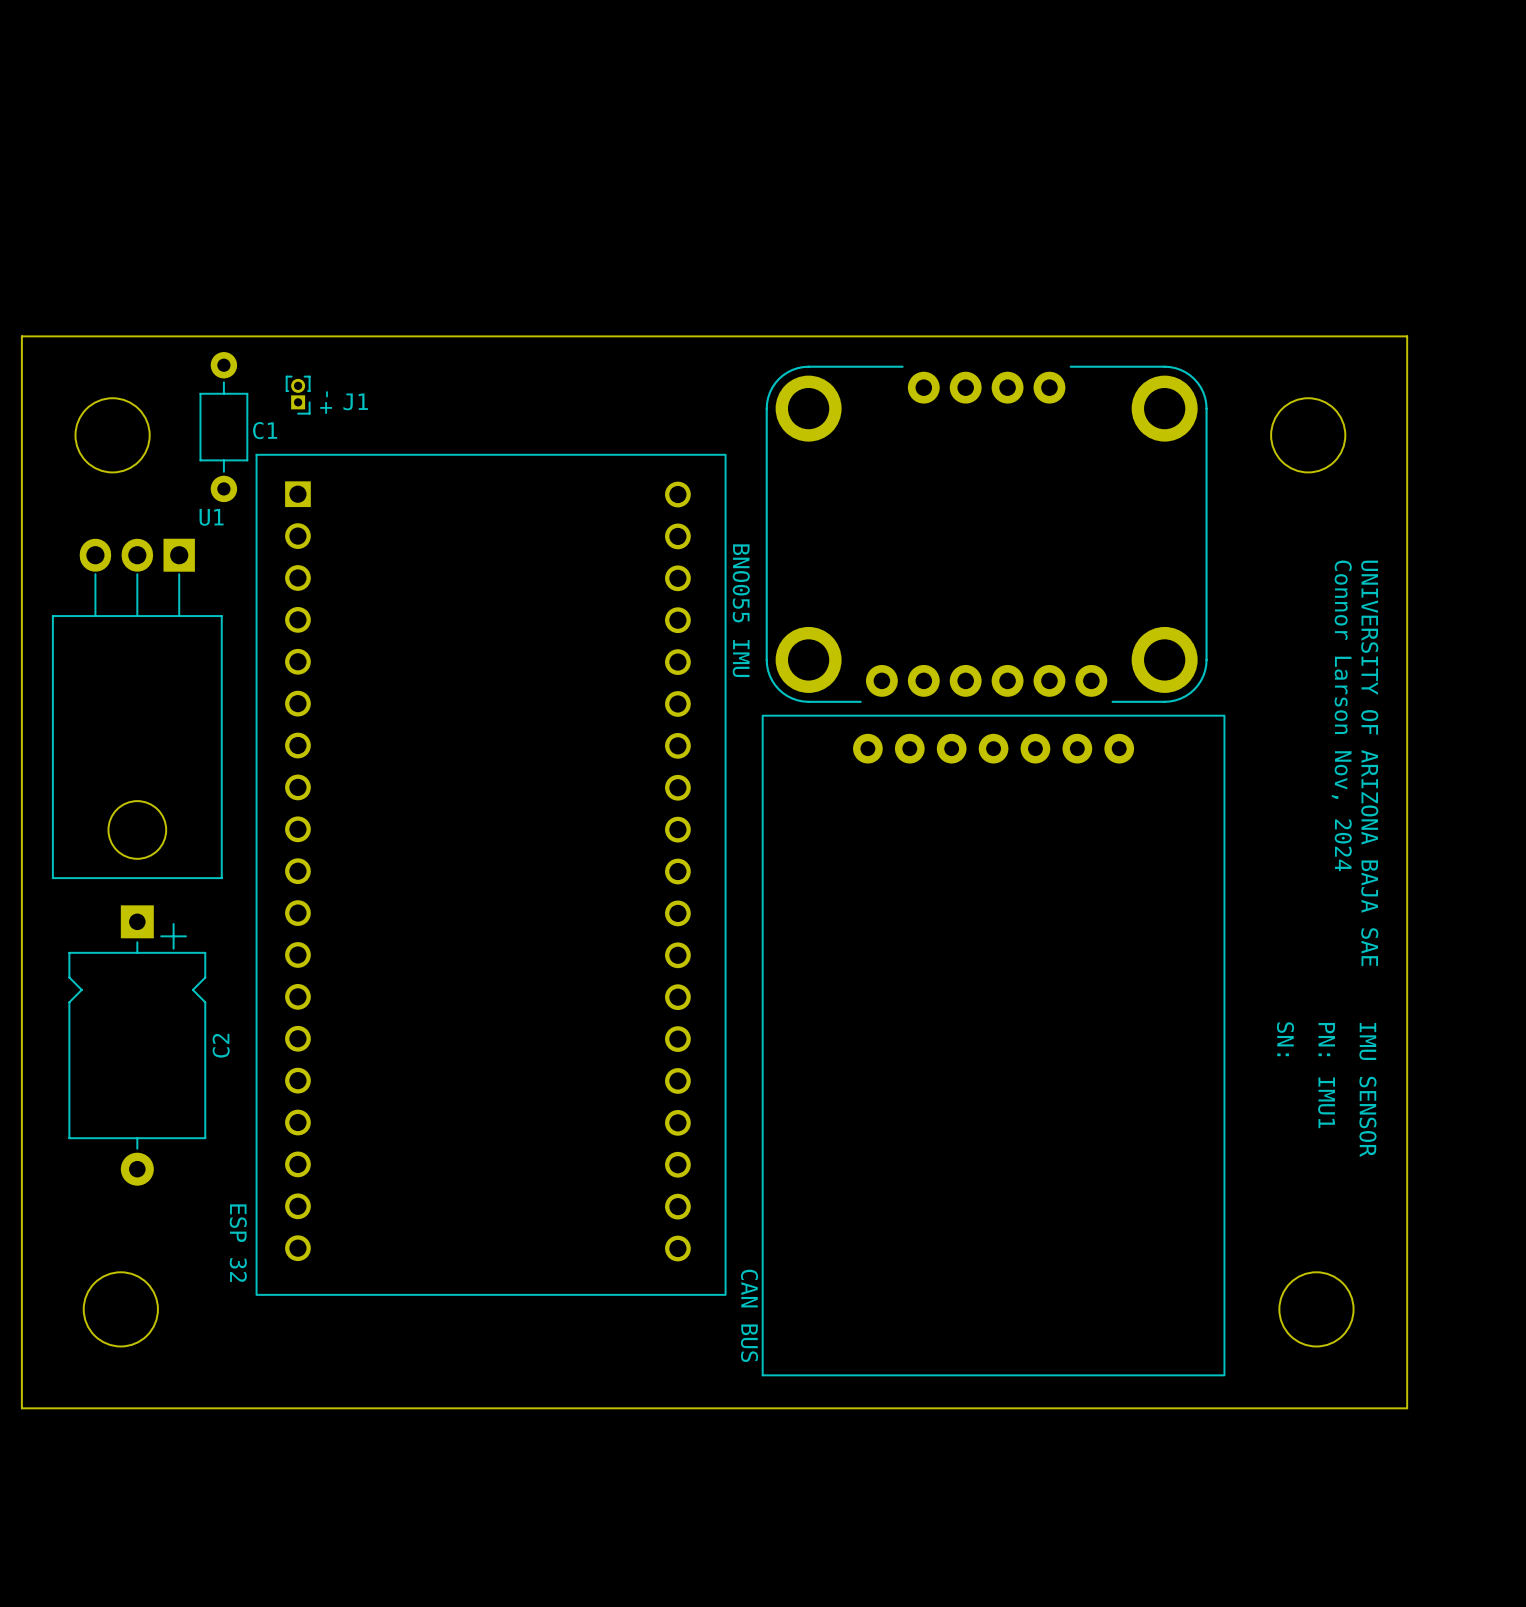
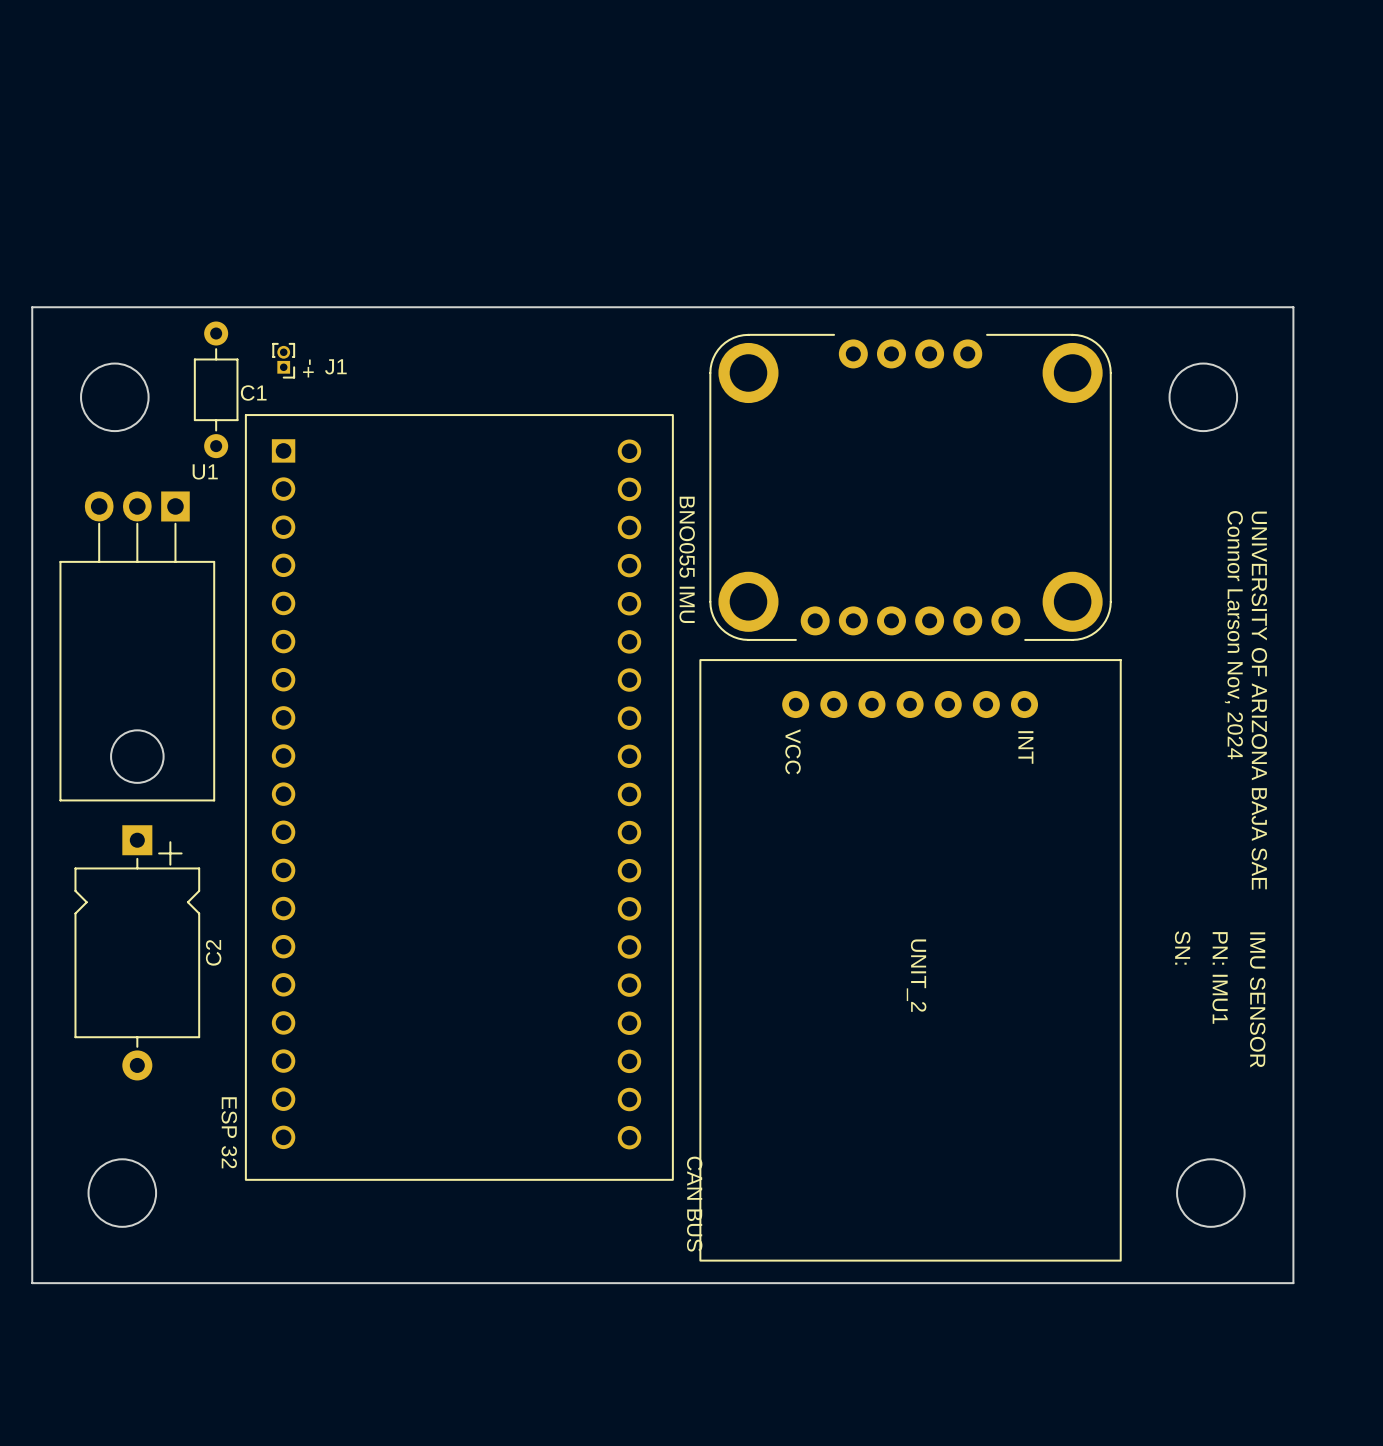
part: (993, 1045) -> none
UNIT_2: none -> (910, 960)

